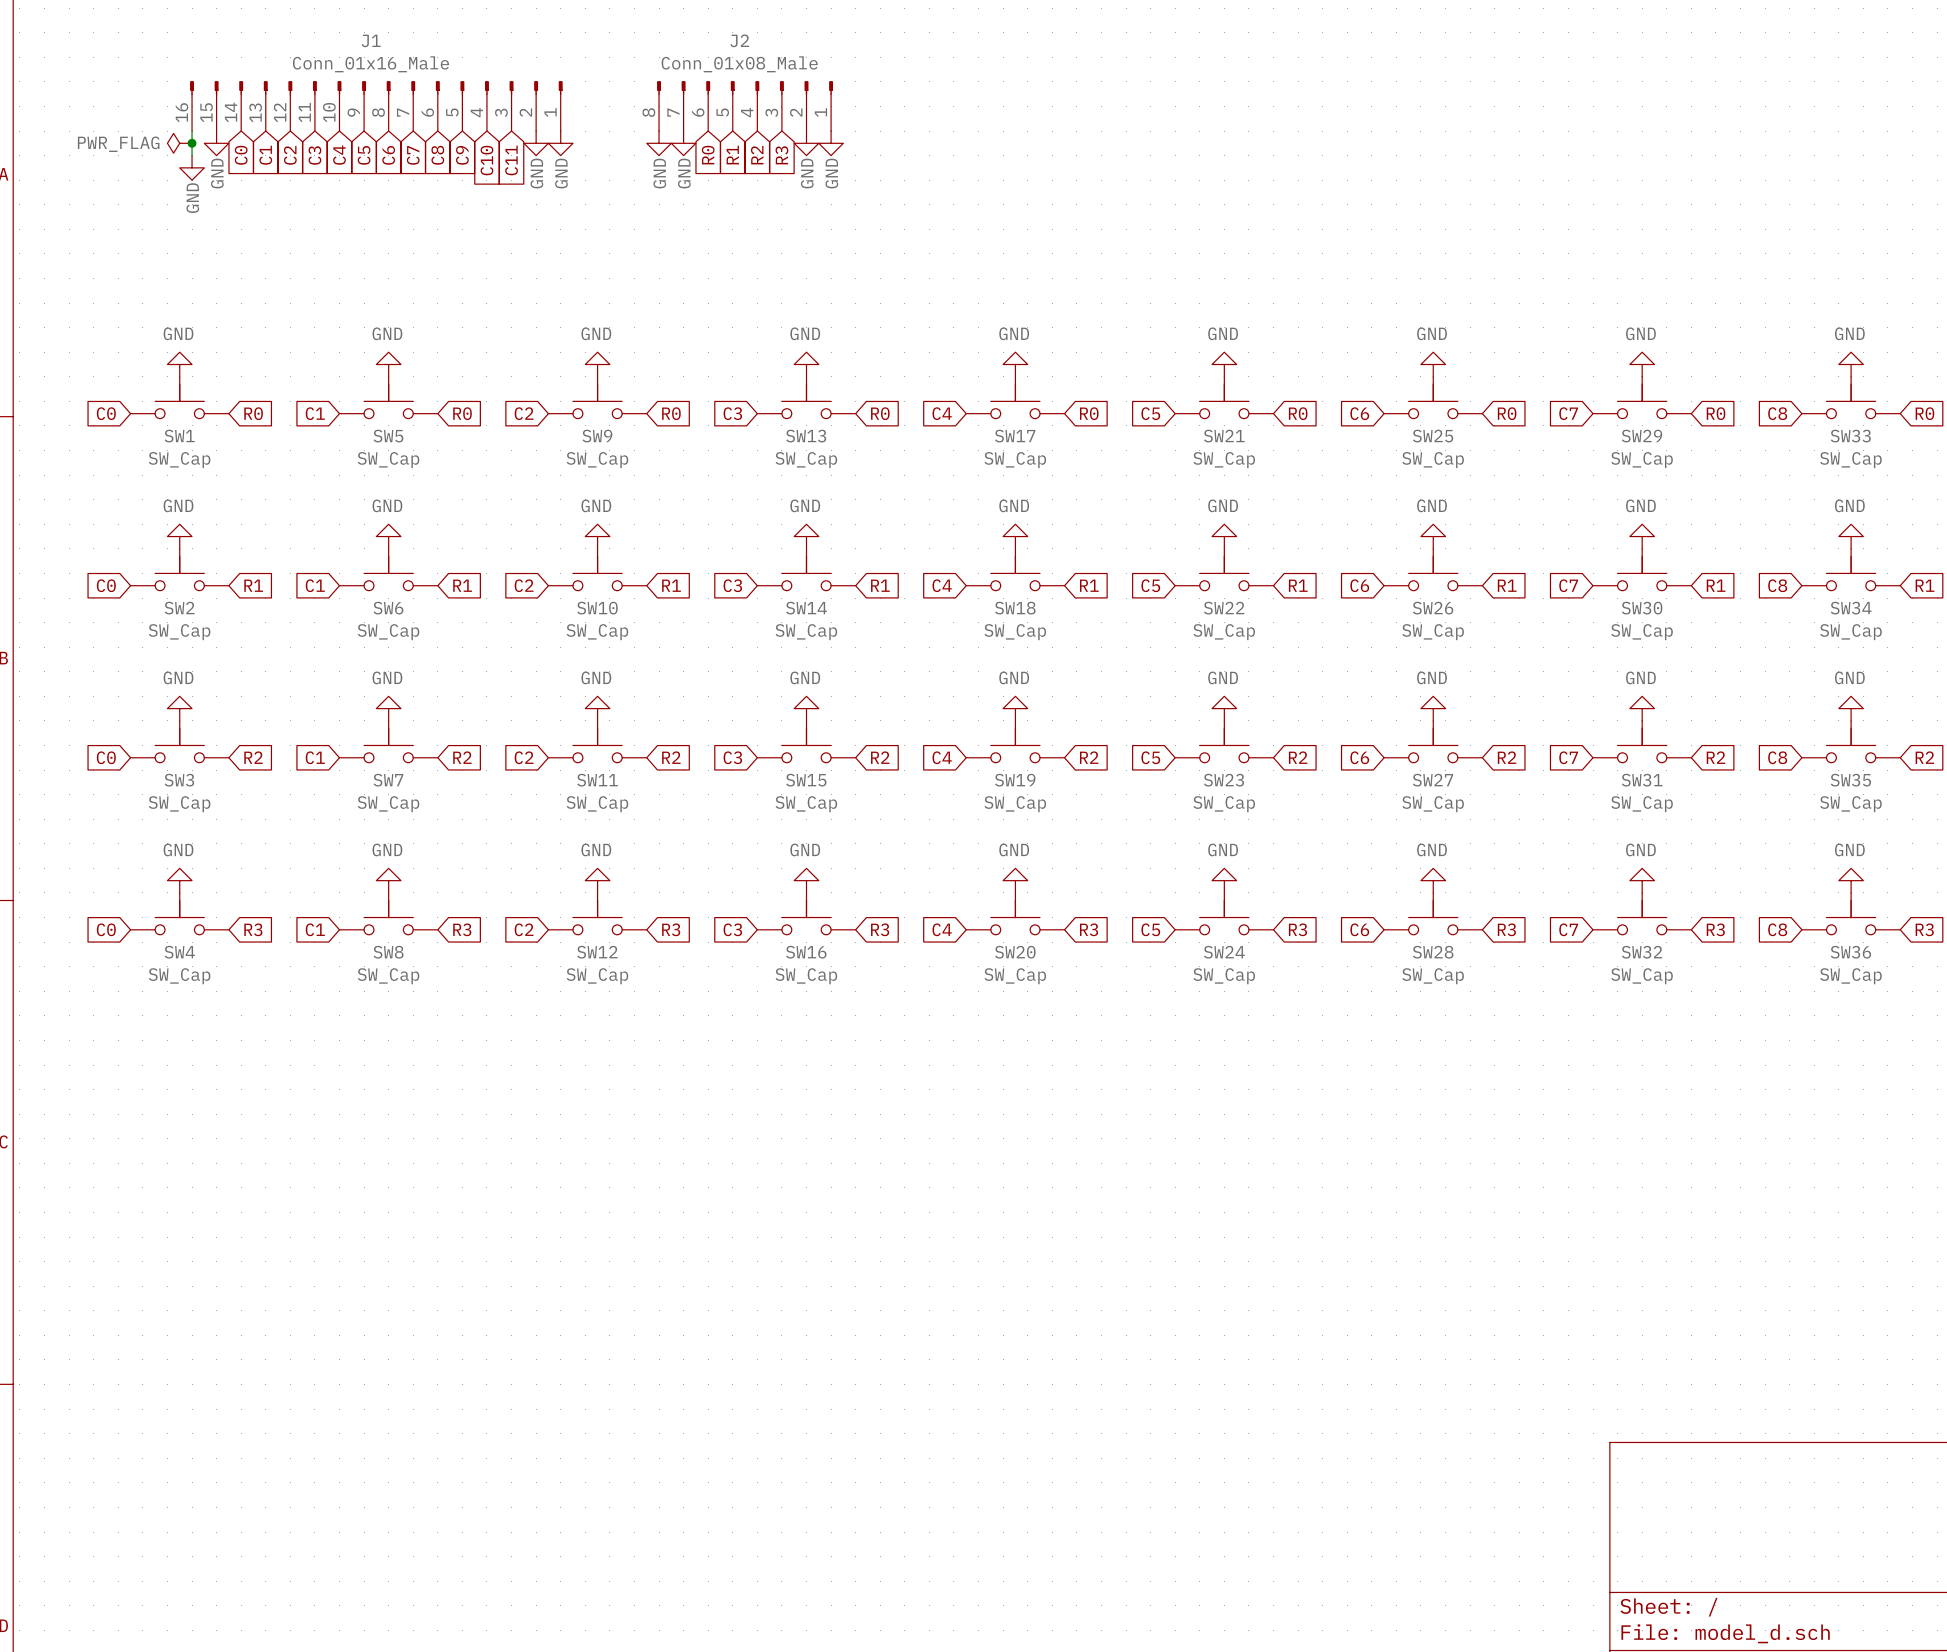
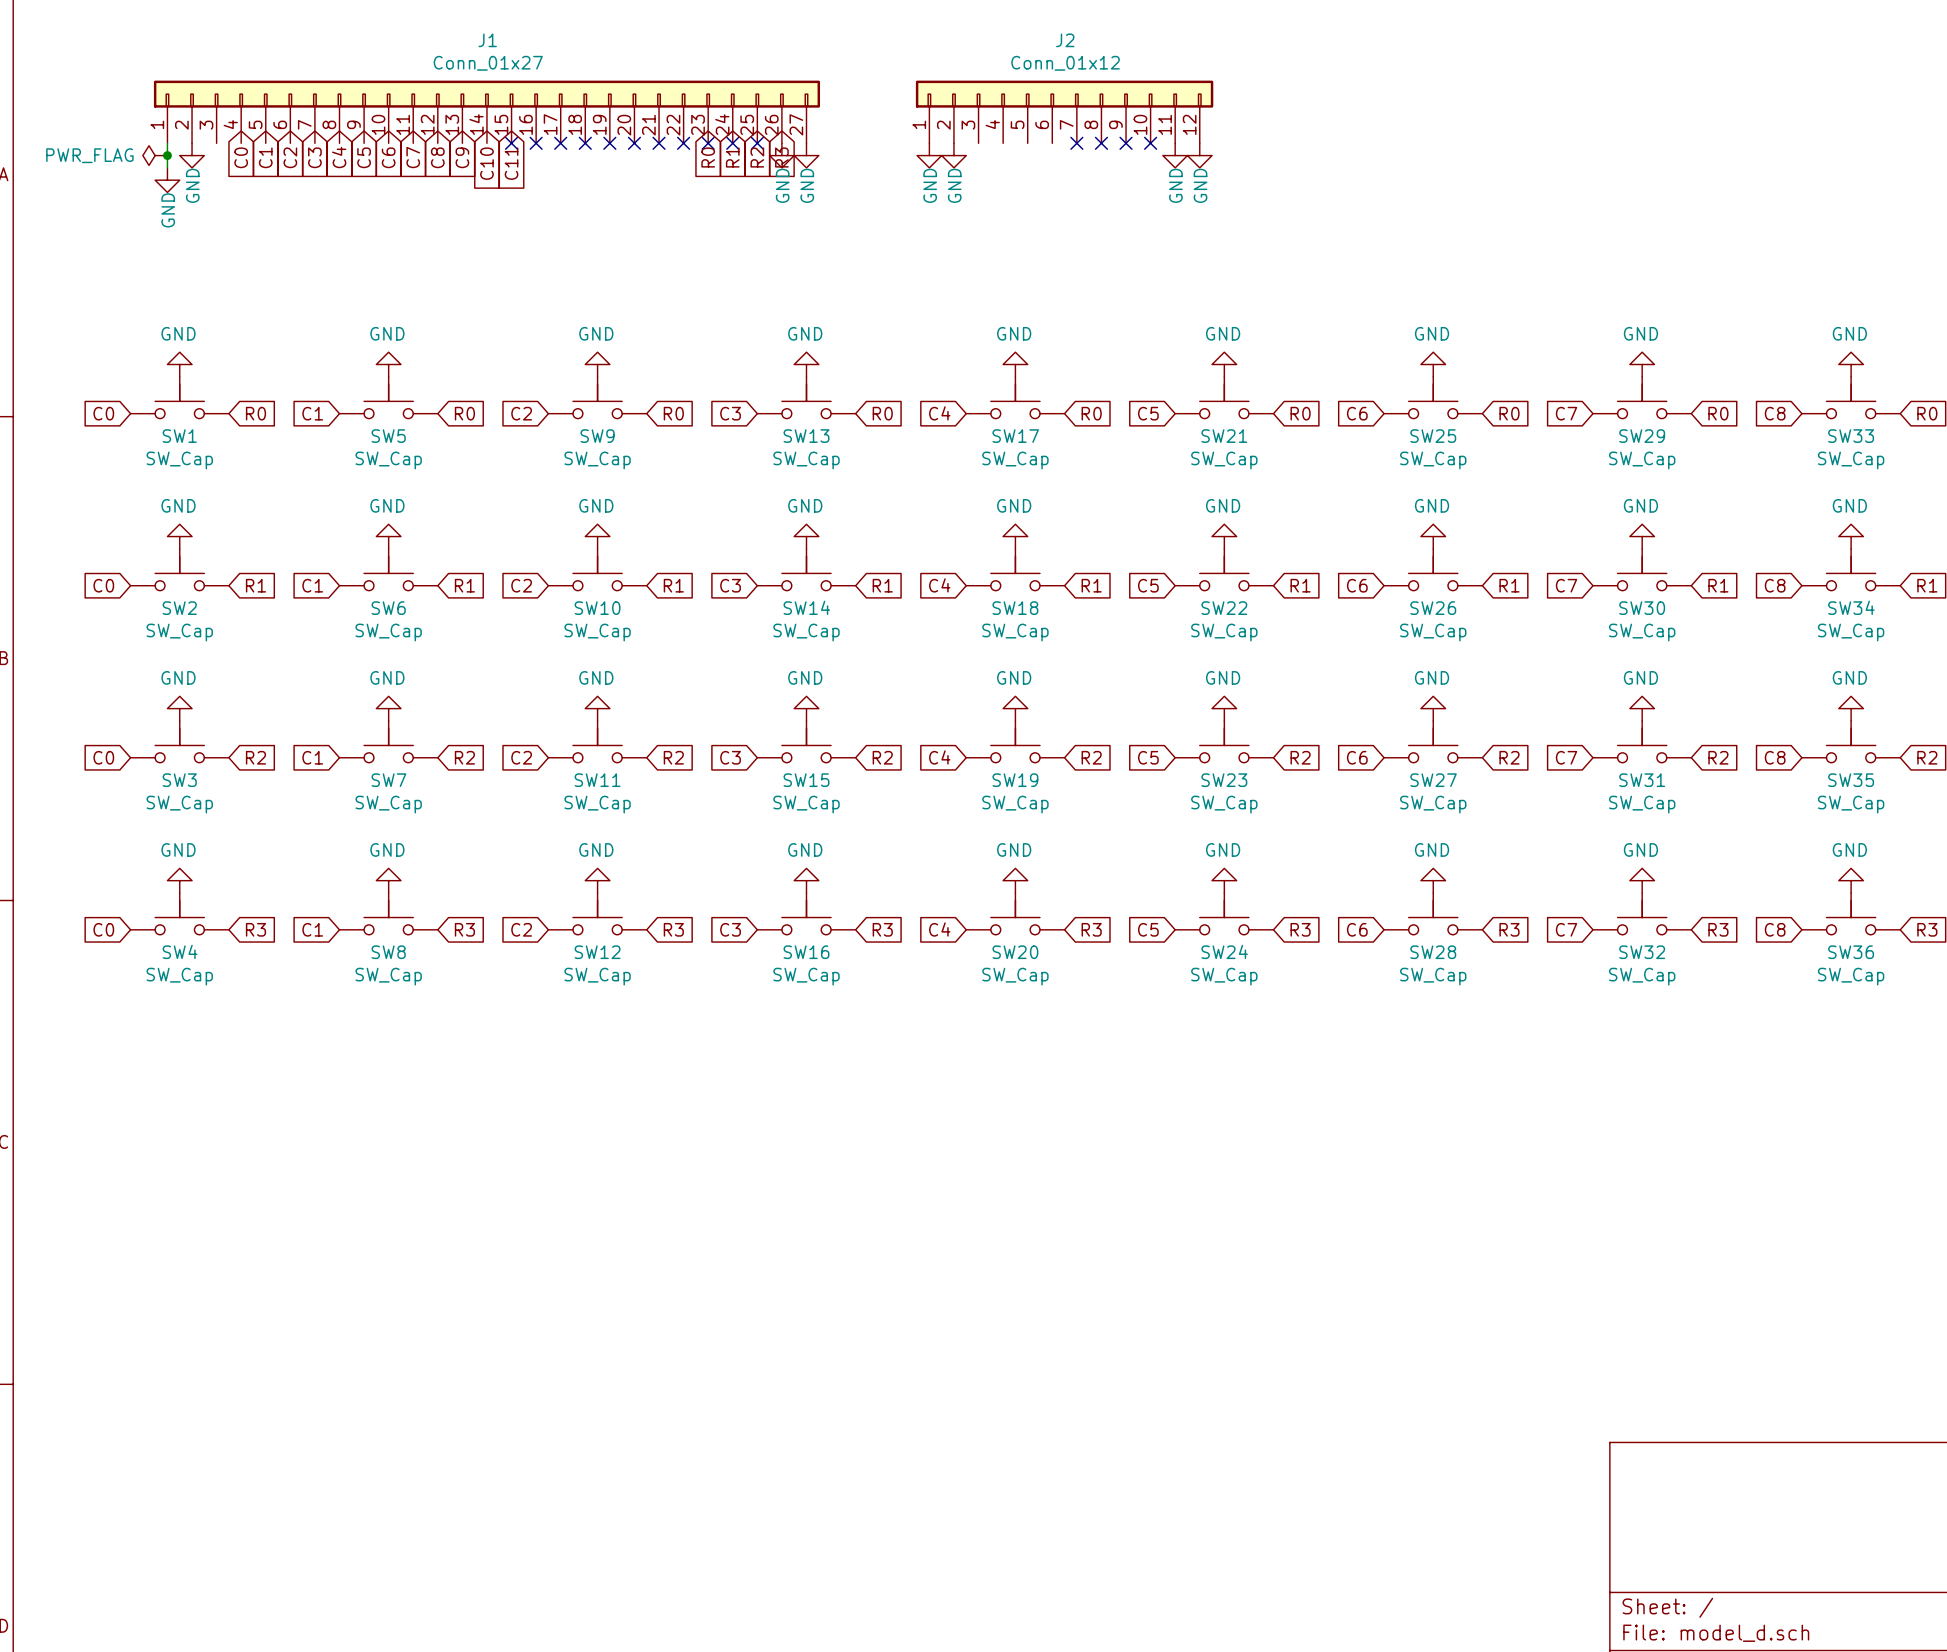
J1 value: Conn_01x16_Male (370, 64) -> Conn_01x27 (488, 63)
J2 value: Conn_01x08_Male (739, 64) -> Conn_01x12 (1065, 63)
J1 symbol: [190, 81, 563, 132] -> [153, 80, 821, 144]
J2 symbol: [657, 81, 834, 132] -> [915, 80, 1214, 144]
power symbol position: PWR_FLAG (179, 143) -> PWR_FLAG (155, 155)
junction position: (192, 143) -> (167, 155)
power symbol: GND (216, 143) -> none
no-connect mark: none -> (511, 143)
power symbol: GND (536, 143) -> none
no-connect mark: none -> (536, 143)
power symbol: GND (560, 143) -> none
no-connect mark: none -> (560, 143)
no-connect mark: none -> (585, 143)
no-connect mark: none -> (609, 143)
no-connect mark: none -> (634, 143)
power symbol: GND (659, 143) -> none
no-connect mark: none -> (659, 143)
power symbol: GND (683, 143) -> none
no-connect mark: none -> (683, 143)
no-connect mark: none -> (708, 143)
no-connect mark: none -> (732, 143)
no-connect mark: none -> (757, 143)
power symbol position: GND (806, 143) -> GND (806, 155)
power symbol: GND (831, 143) -> none
no-connect mark: none -> (1076, 143)
no-connect mark: none -> (1101, 143)
no-connect mark: none -> (1126, 143)
no-connect mark: none -> (1150, 143)
power symbol: none -> GND (781, 155)
power symbol: none -> GND (929, 155)
power symbol: none -> GND (953, 155)
power symbol: none -> GND (1175, 155)
power symbol: none -> GND (1199, 155)
power symbol position: GND (192, 167) -> GND (192, 155)
power symbol: none -> GND (167, 180)

